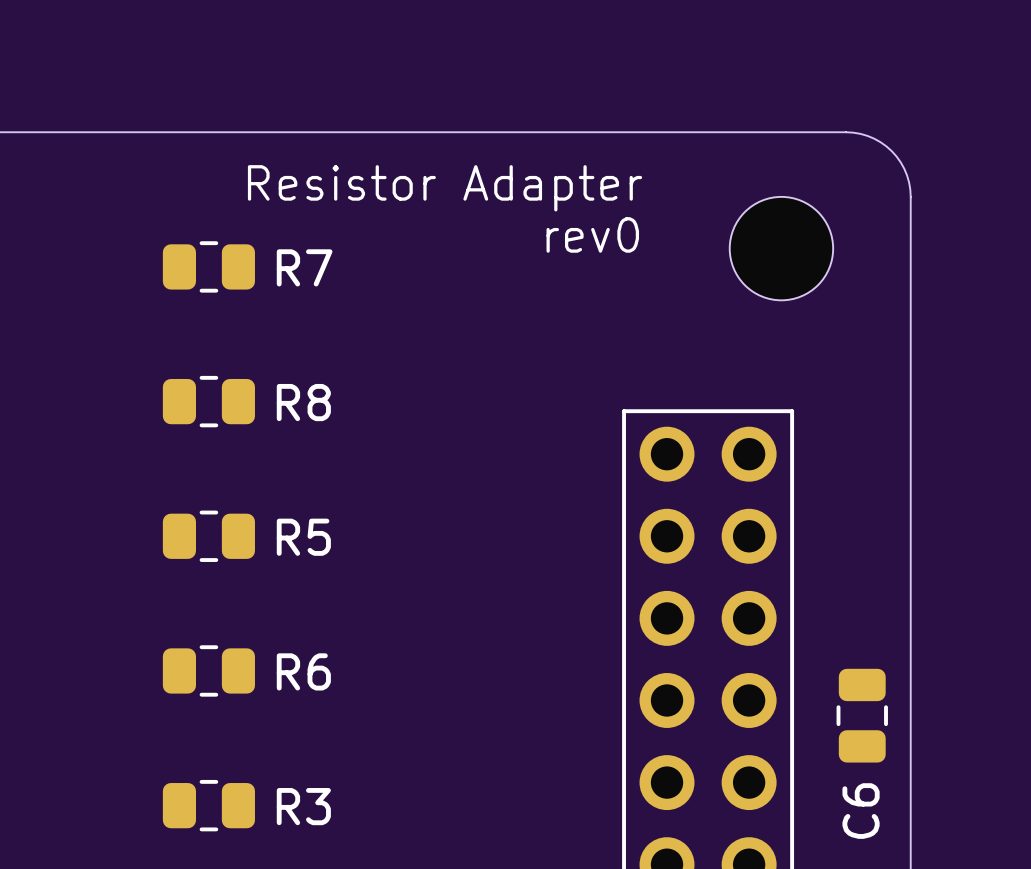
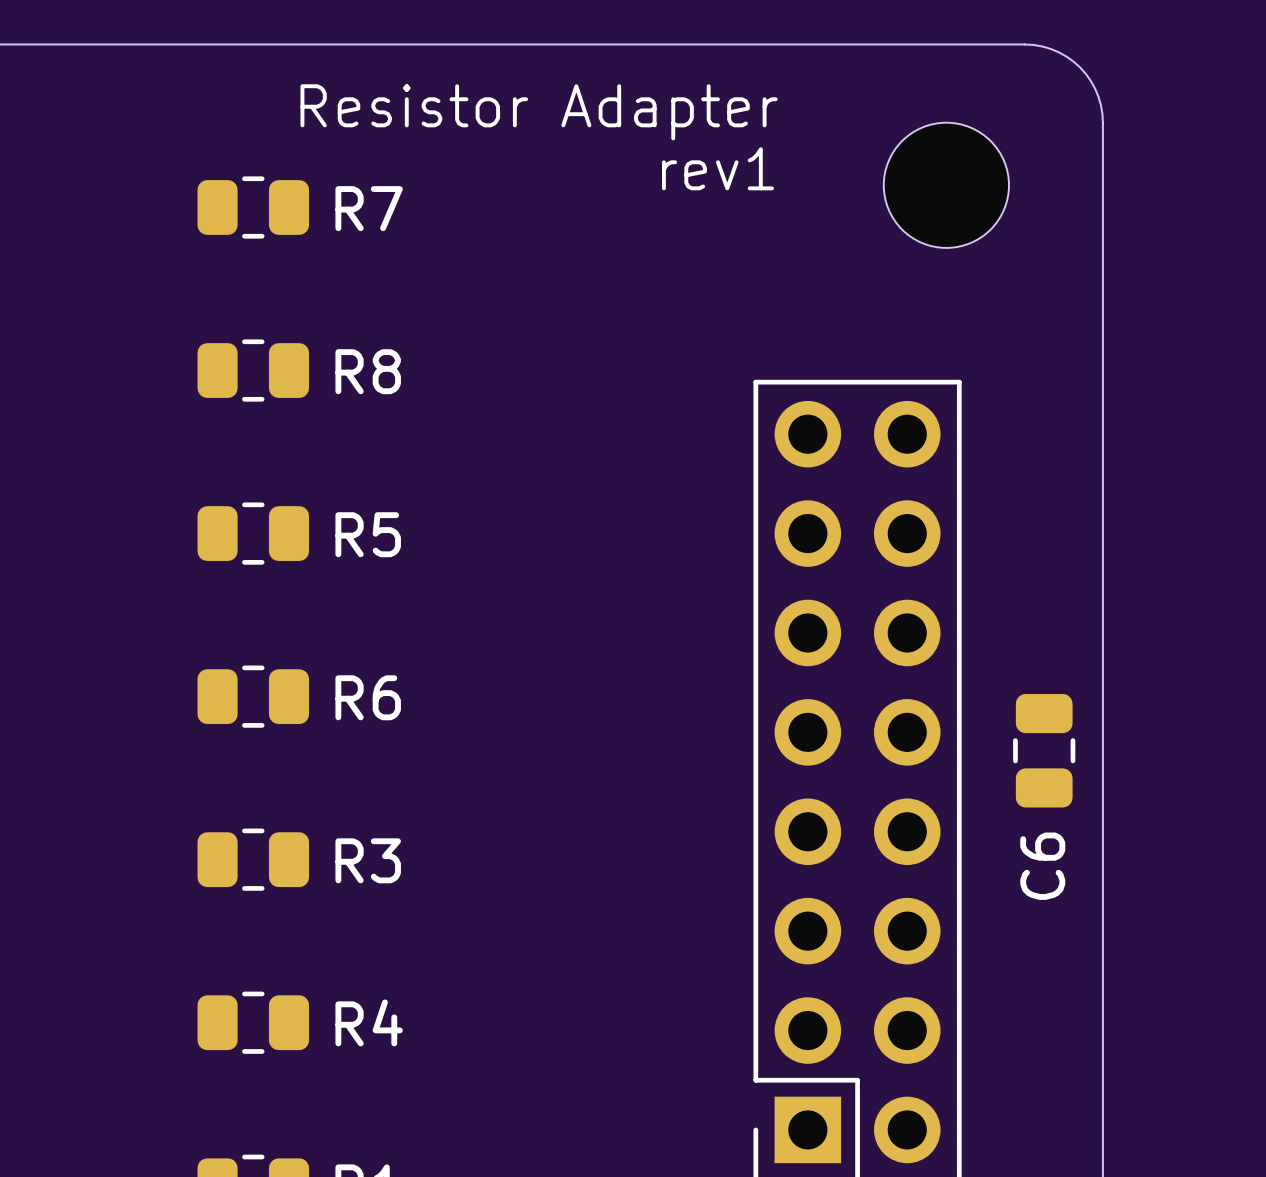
text: rev0 (592, 234) -> rev1 (717, 168)

